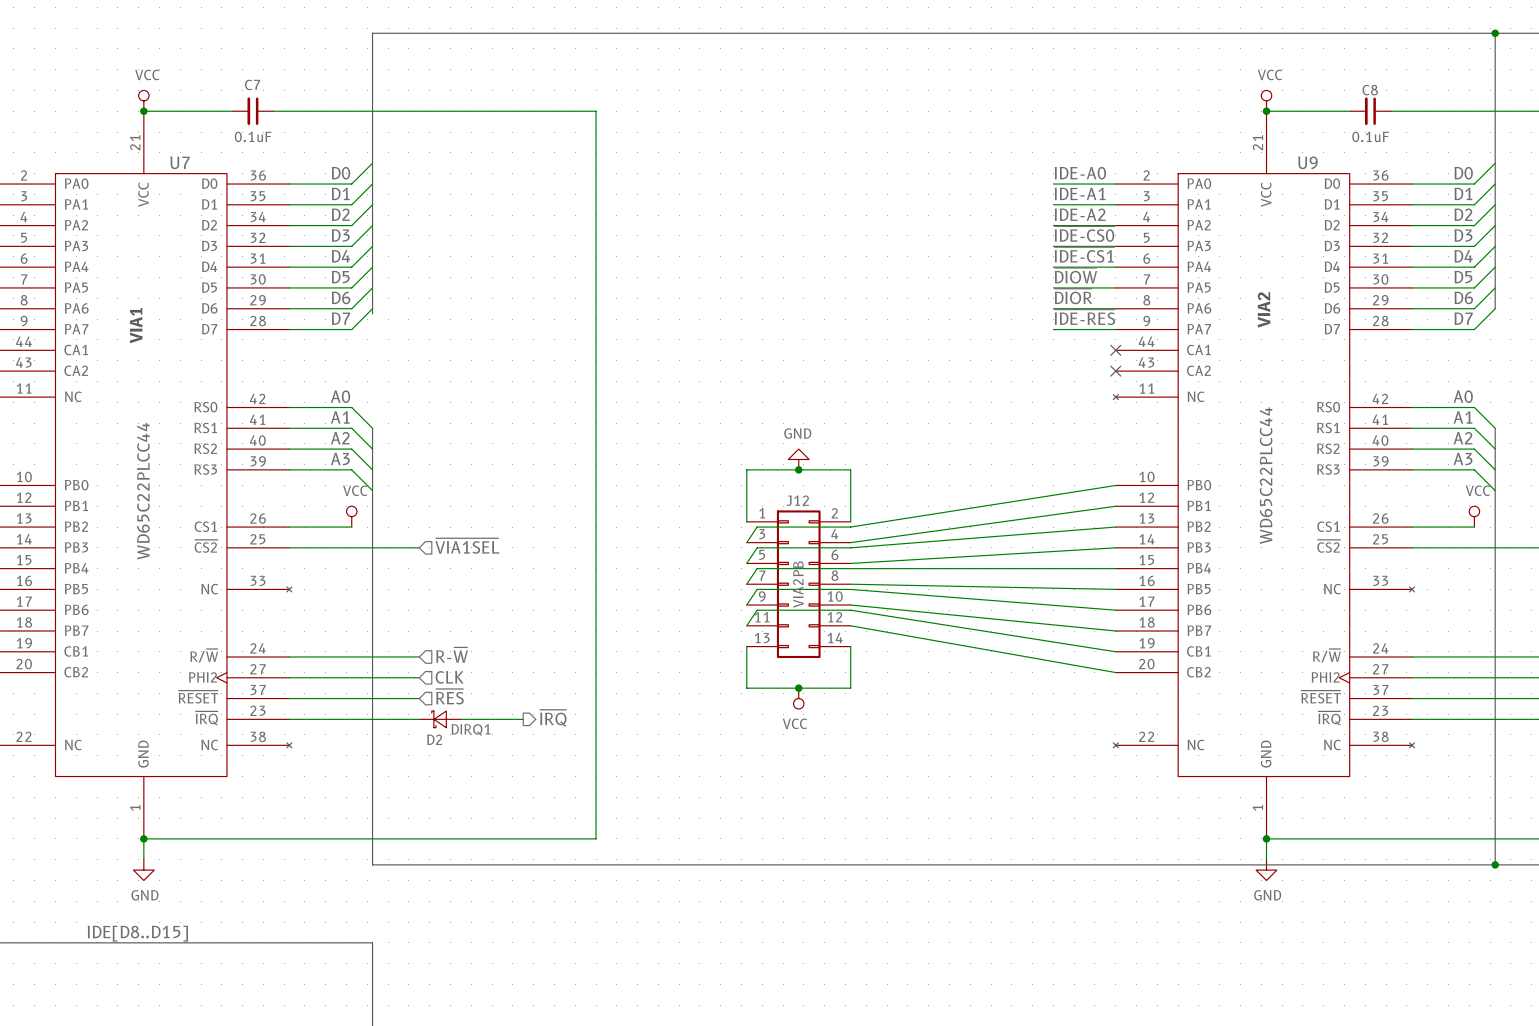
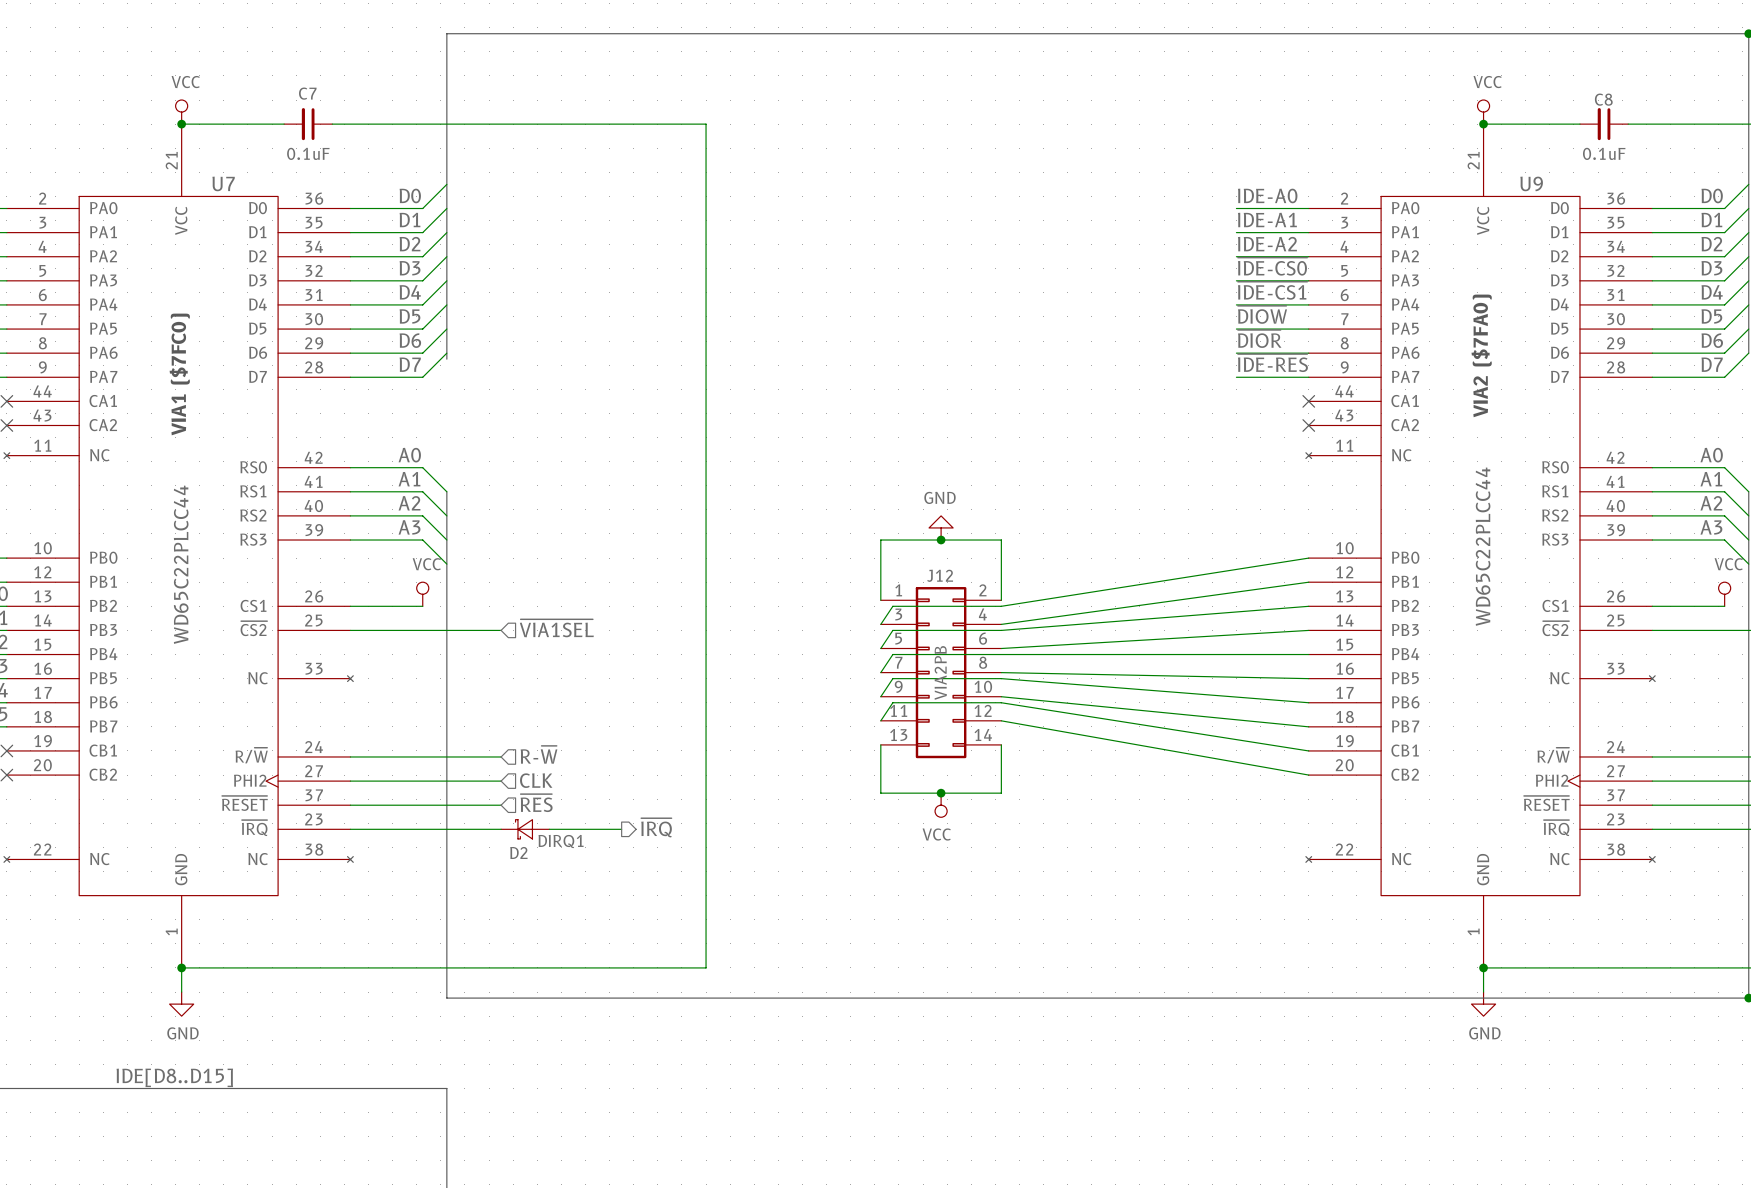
text: VIA2 (1264, 309) -> none
text: none -> VIA2 ($7FA0) (1481, 355)
text: VIA1 (136, 325) -> none
text: none -> VIA1 ($7FC0) (179, 374)

